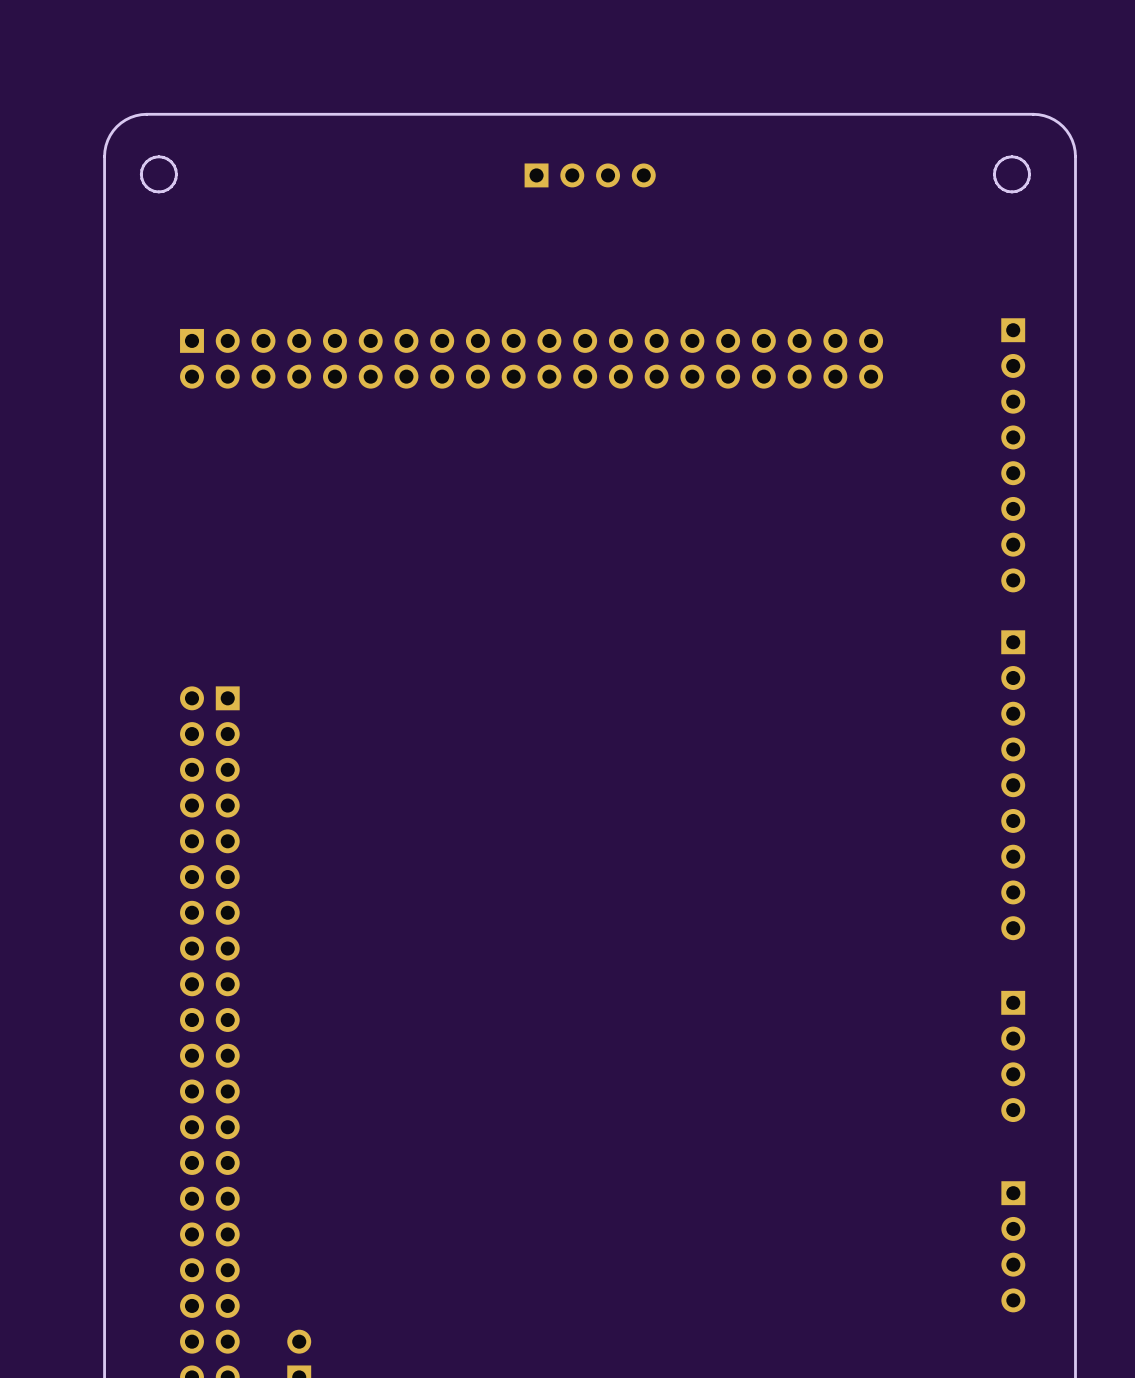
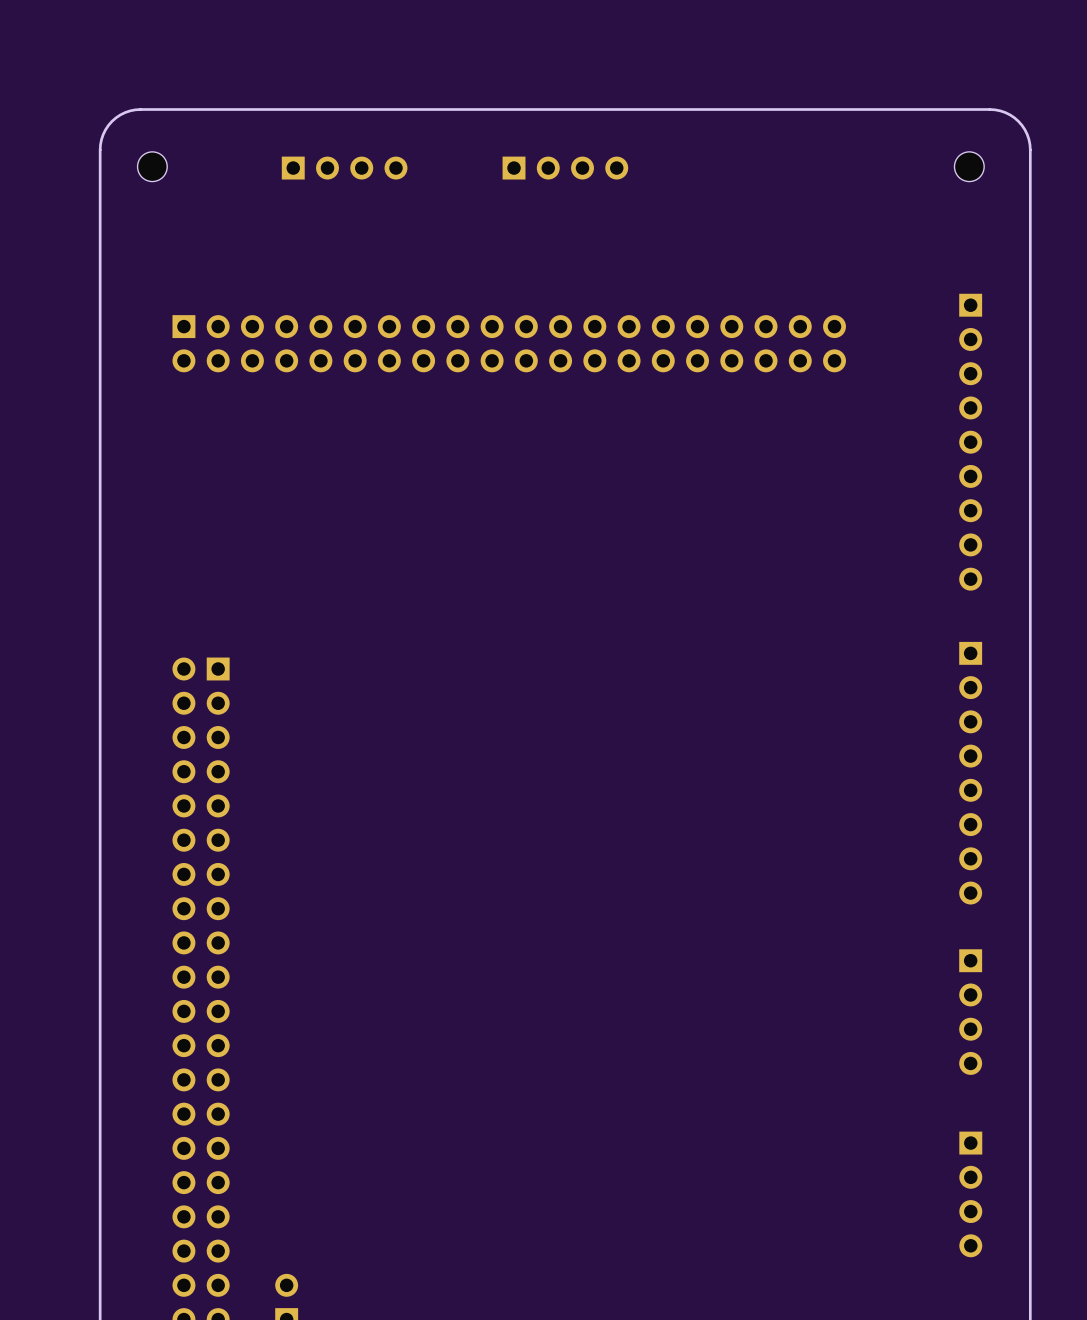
board edge: (158, 156) (171, 161) (176, 174) (171, 186) (158, 191) (146, 186) (141, 174) (146, 161) (158, 156) -> none
board edge: (1011, 156) (1024, 161) (1029, 174) (1024, 186) (1011, 191) (999, 186) (994, 174) (999, 161) (1011, 156) -> none
part: none -> (152, 166)
part: none -> (969, 166)
part: none -> (344, 168)
part footprint: [1001, 318, 1026, 593] -> [959, 293, 983, 591]
part: (1013, 785) -> none
part: none -> (970, 773)

